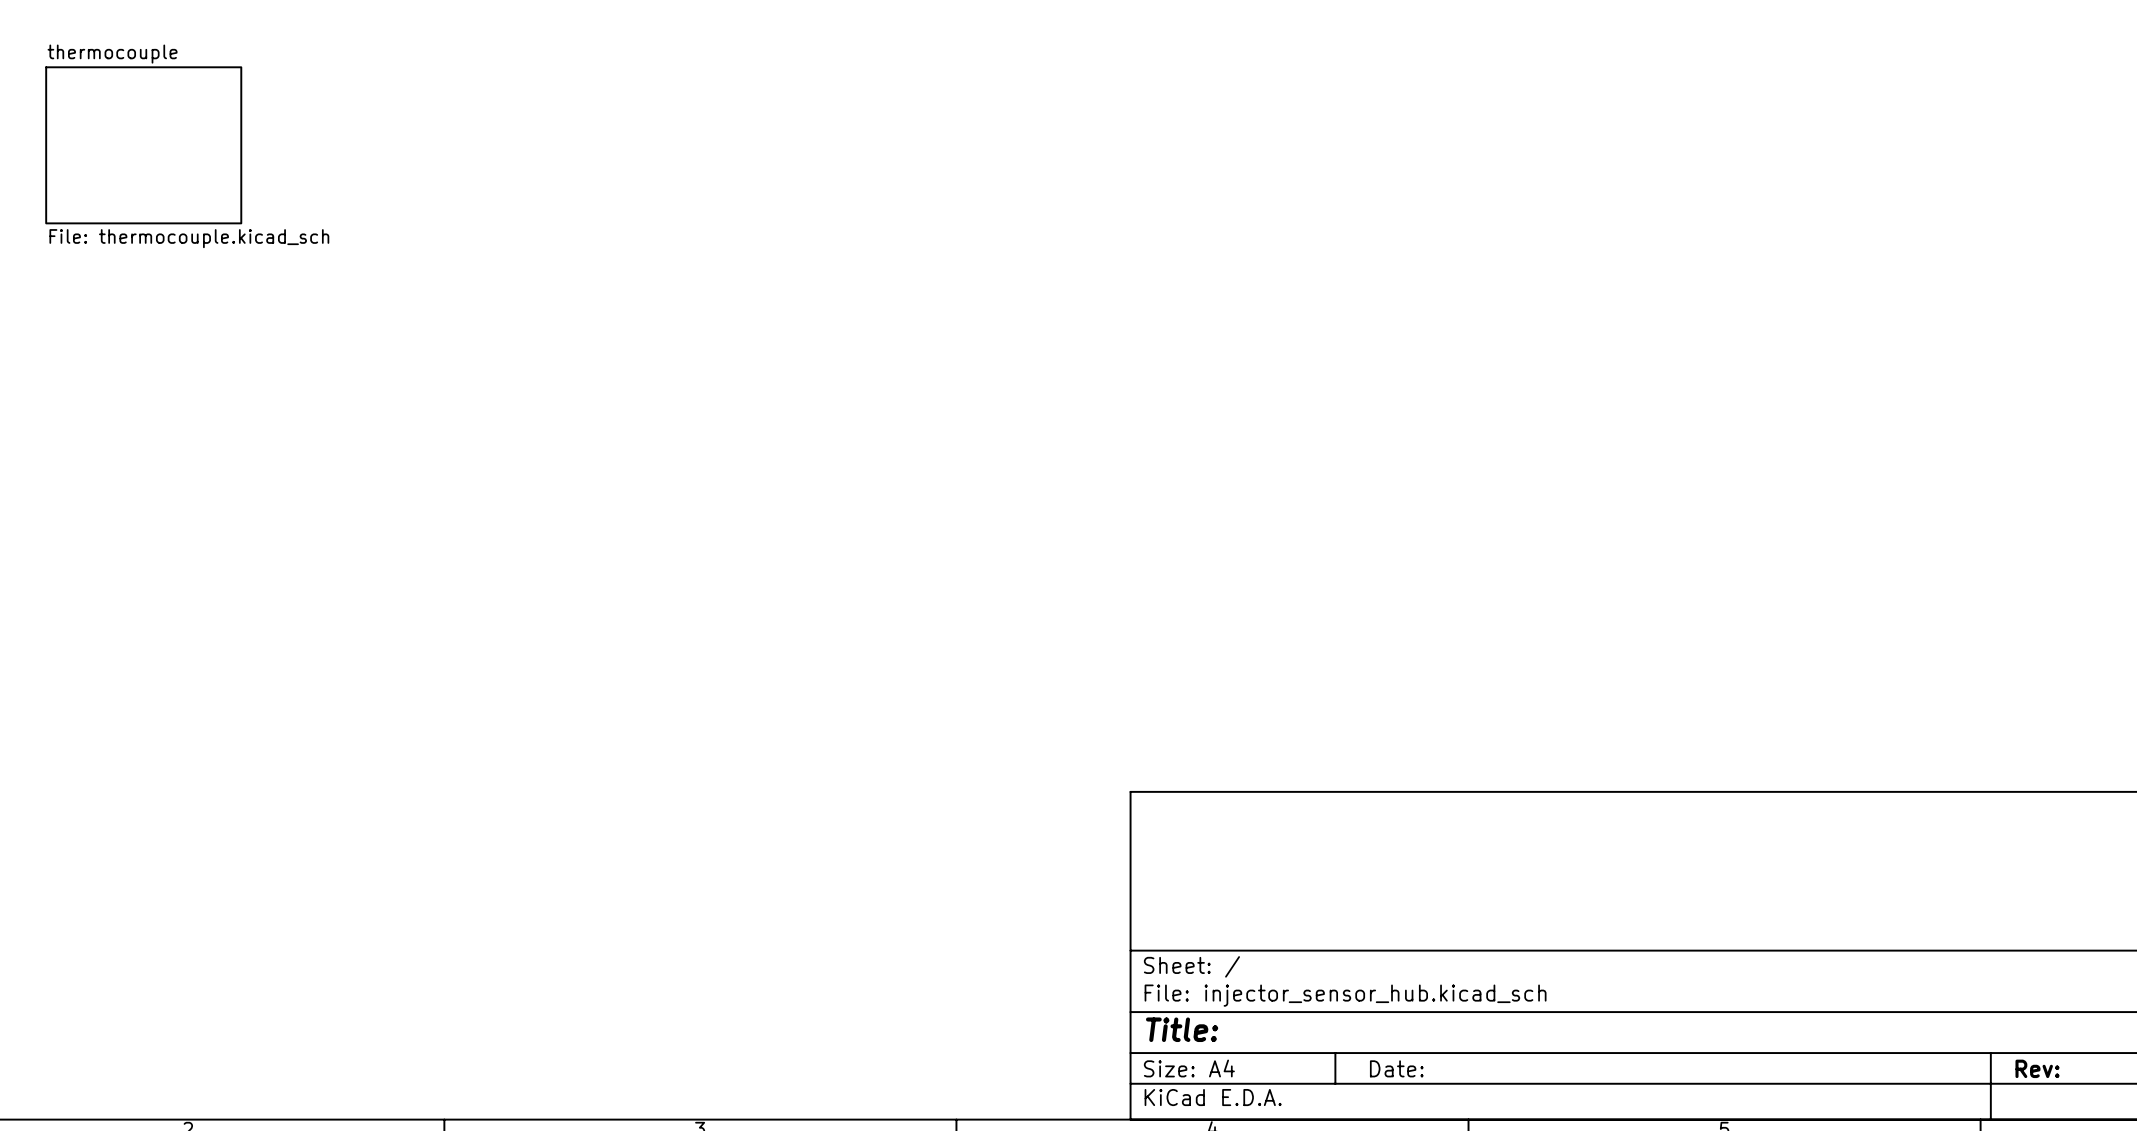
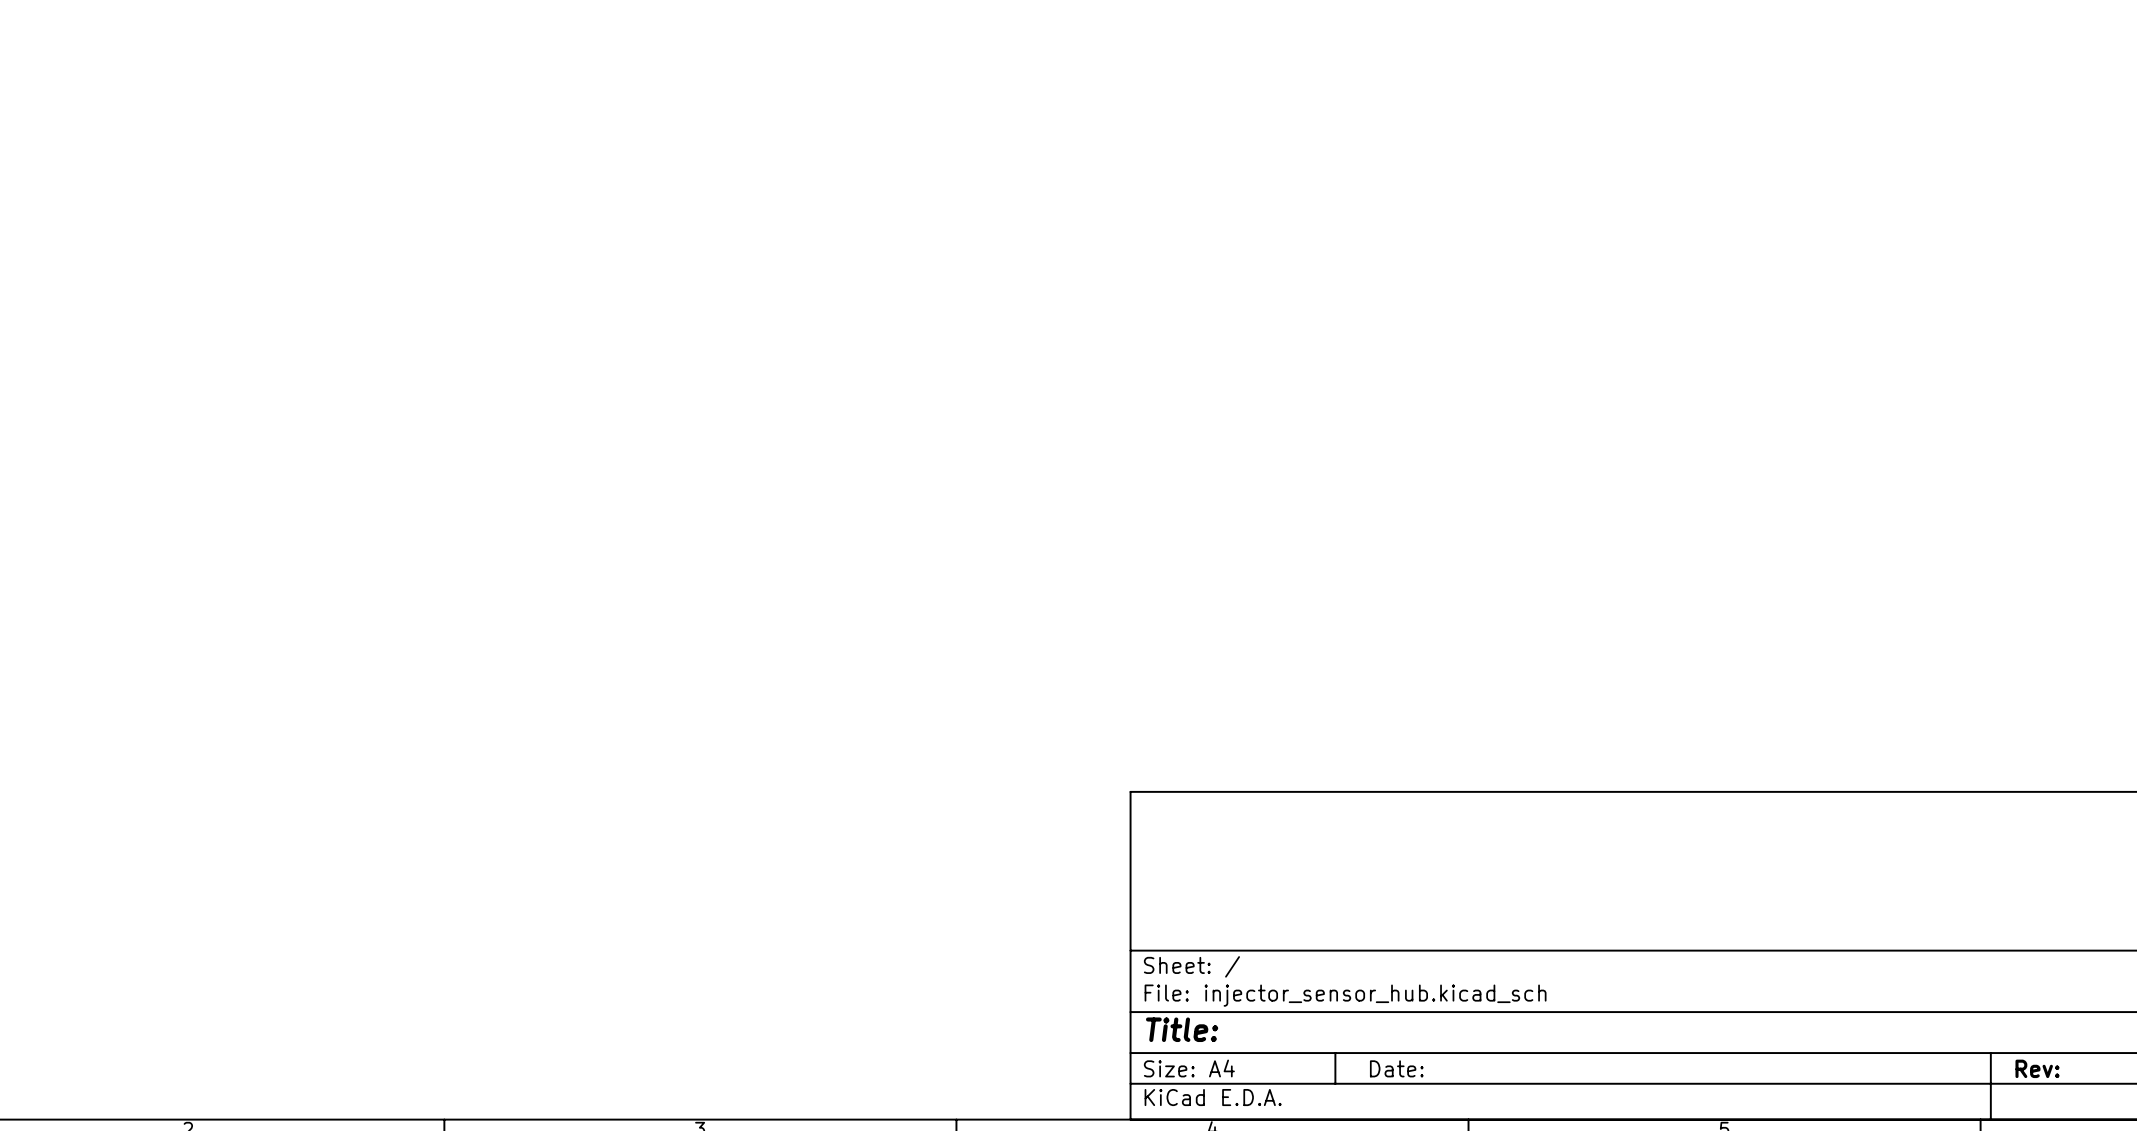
sheet thermocouple: File: thermocouple.kicad_sch (143, 145) -> none

